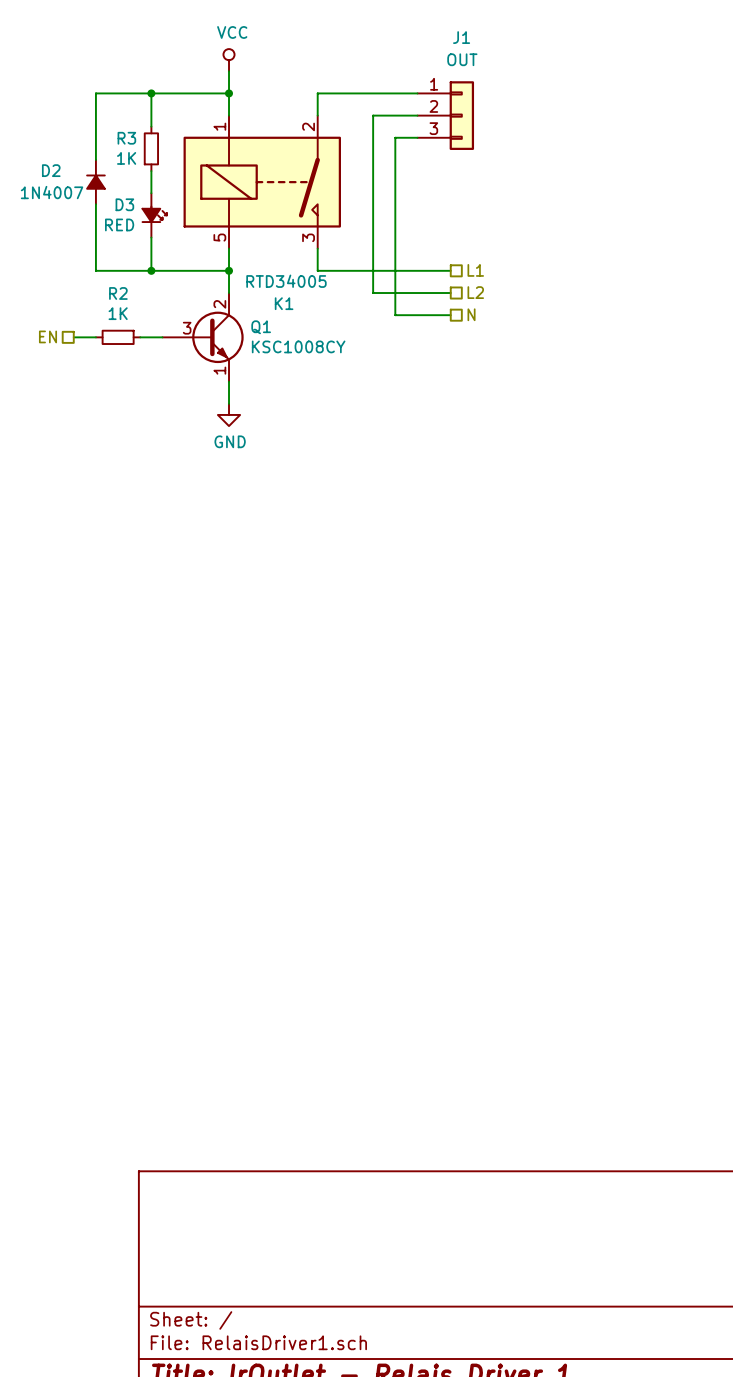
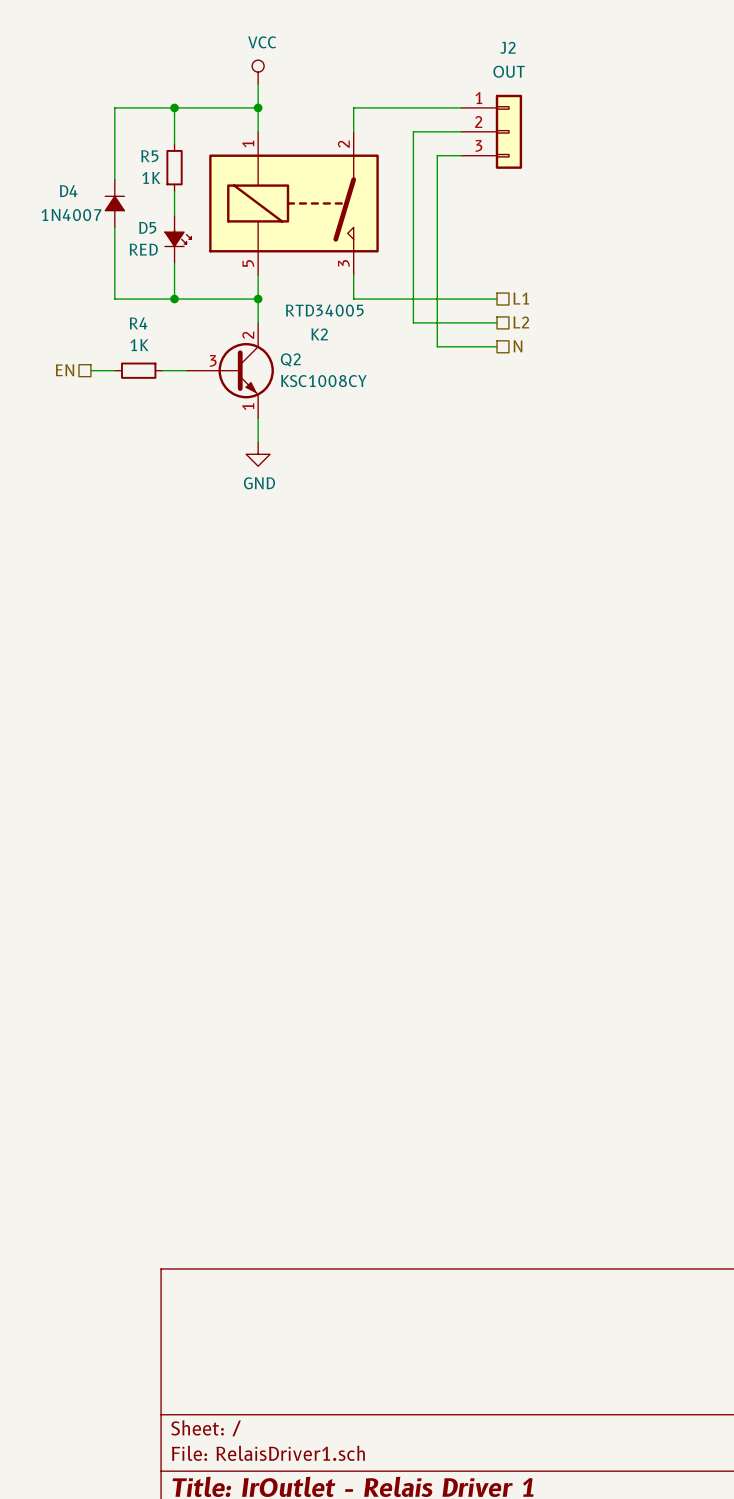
J1 name: J1 (461, 37) -> J2 (507, 47)
R3 name: R3 (126, 138) -> R5 (149, 156)
D2 name: D2 (51, 170) -> D4 (68, 191)
D3 name: D3 (124, 204) -> D5 (147, 227)
R2 name: R2 (118, 293) -> R4 (138, 323)
K1 name: K1 (284, 303) -> K2 (319, 334)
Q1 name: Q1 (261, 327) -> Q2 (290, 359)

